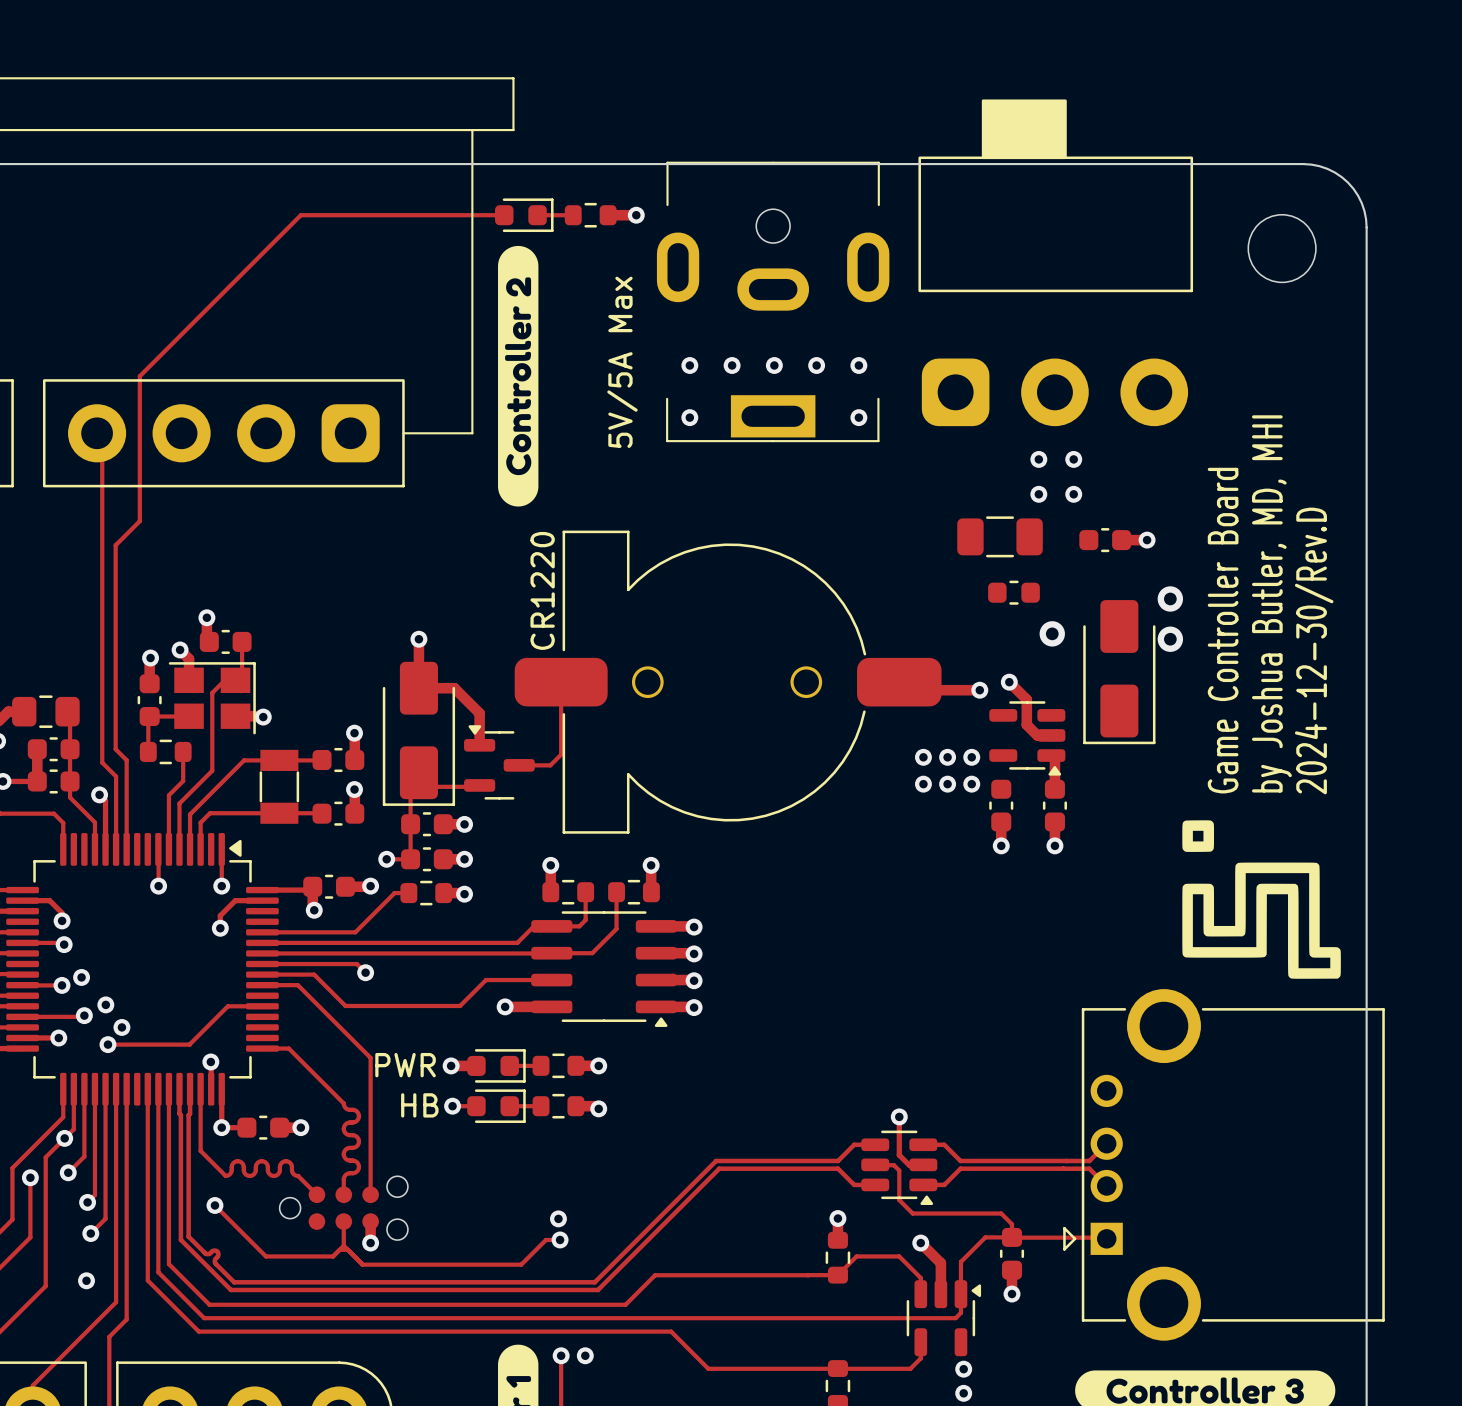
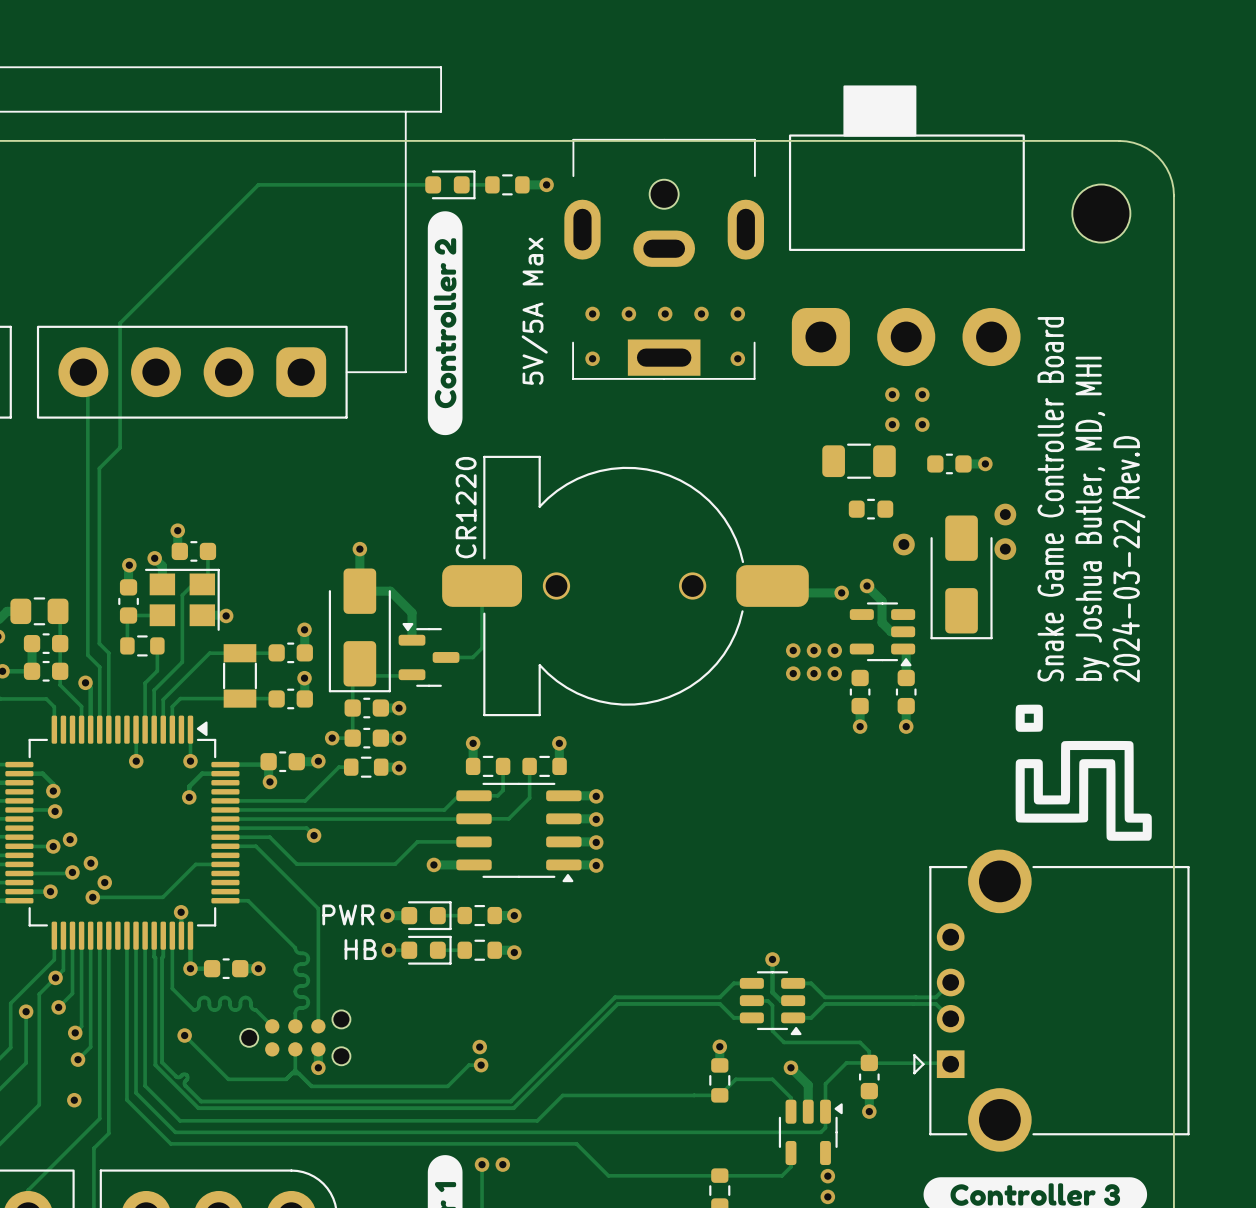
text: Game Controller Board (1223, 630) -> Snake Game Controller Board (1050, 499)
text: 2024-12-30/Rev.D (1314, 650) -> 2024-03-22/Rev.D (1128, 559)

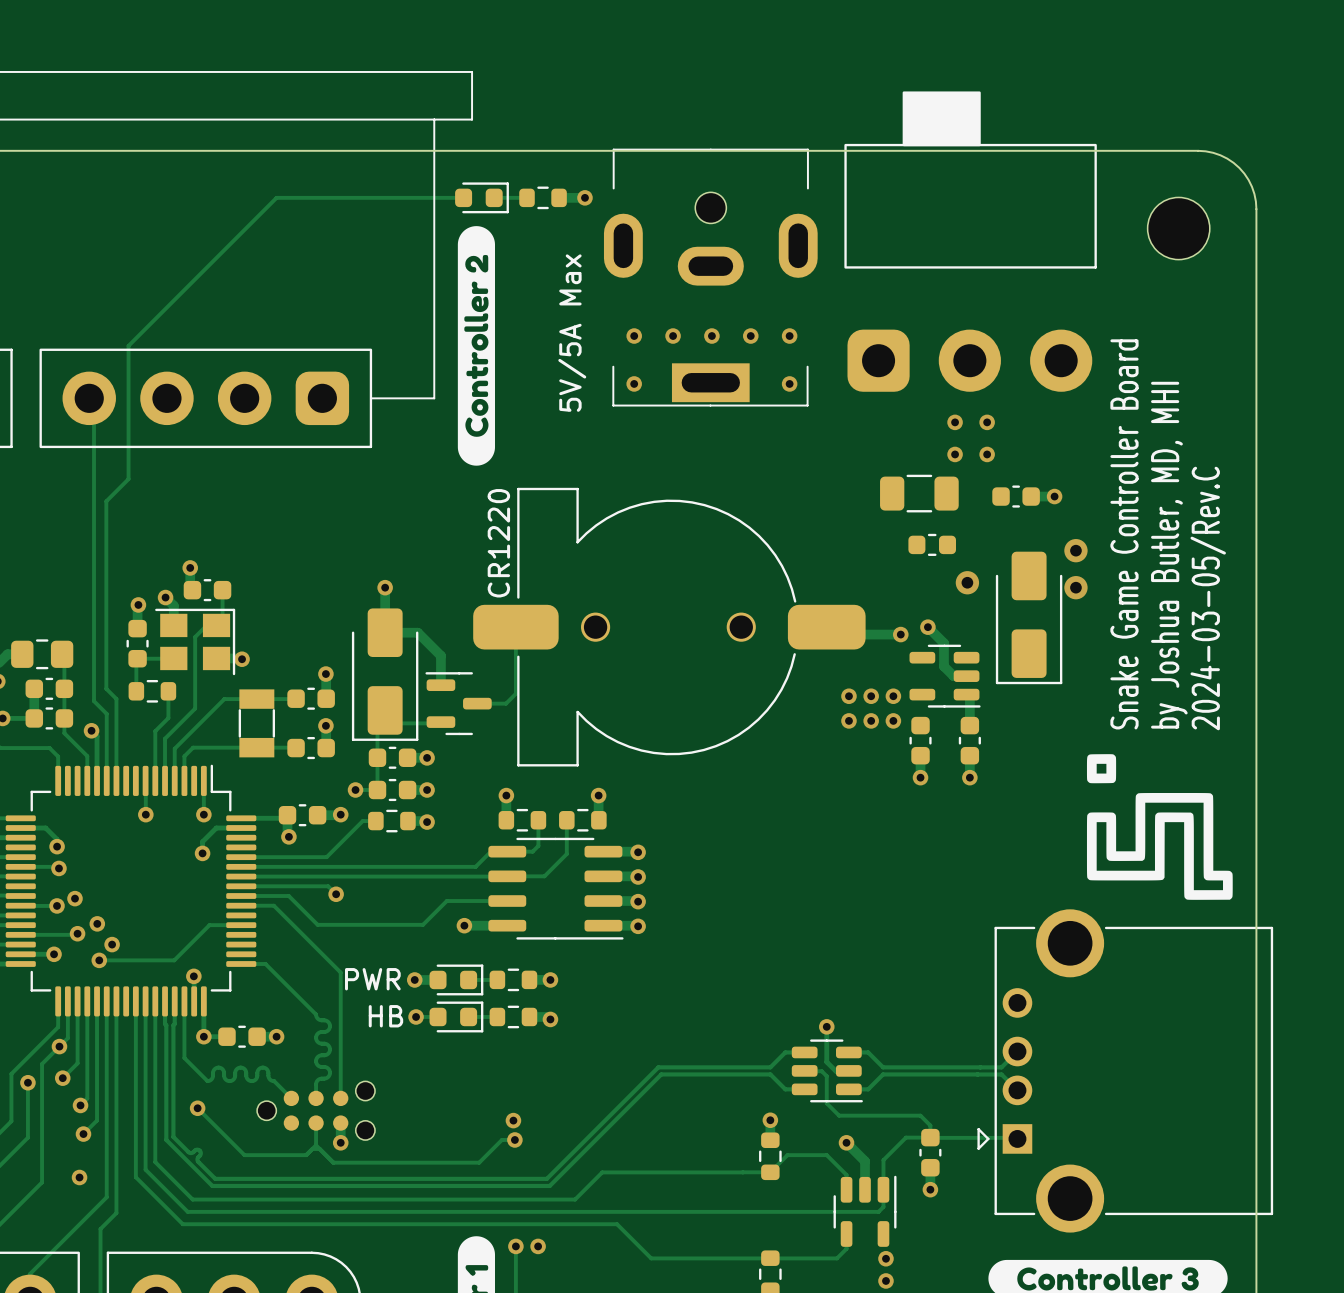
text: 2024-03-22/Rev.D (1128, 559) -> 2024-03-05/Rev.C (1208, 598)
part footprint: [849, 602, 916, 667] -> [909, 644, 981, 708]
part footprint: [398, 622, 460, 687] -> [425, 672, 492, 736]
part footprint: [5, 715, 240, 950] -> [5, 764, 257, 1017]
part footprint: [456, 782, 582, 883] -> [488, 837, 624, 940]
part footprint: [739, 971, 806, 1036] -> [791, 1039, 863, 1103]
part footprint: [778, 1099, 843, 1166] -> [833, 1175, 897, 1247]

